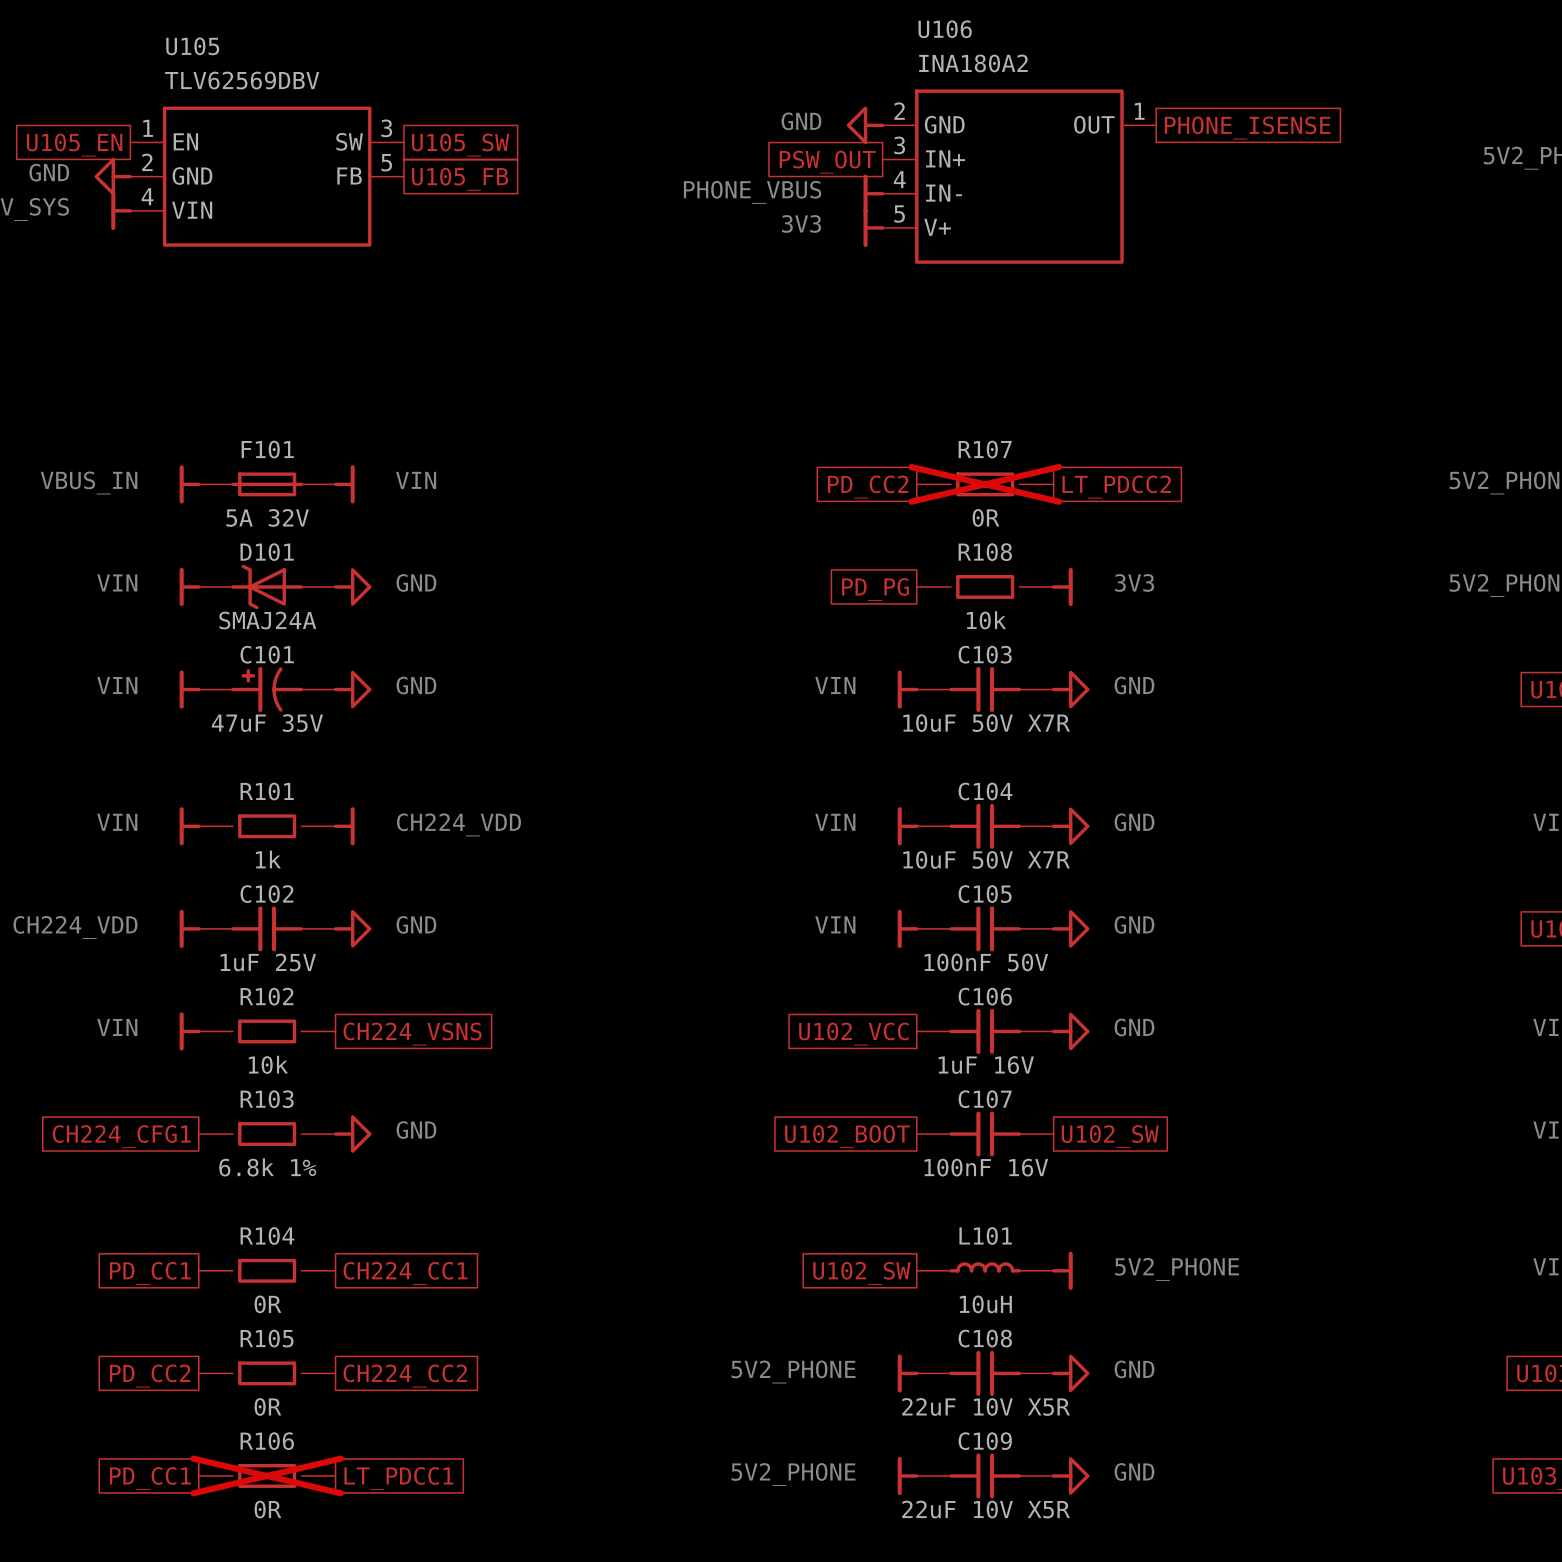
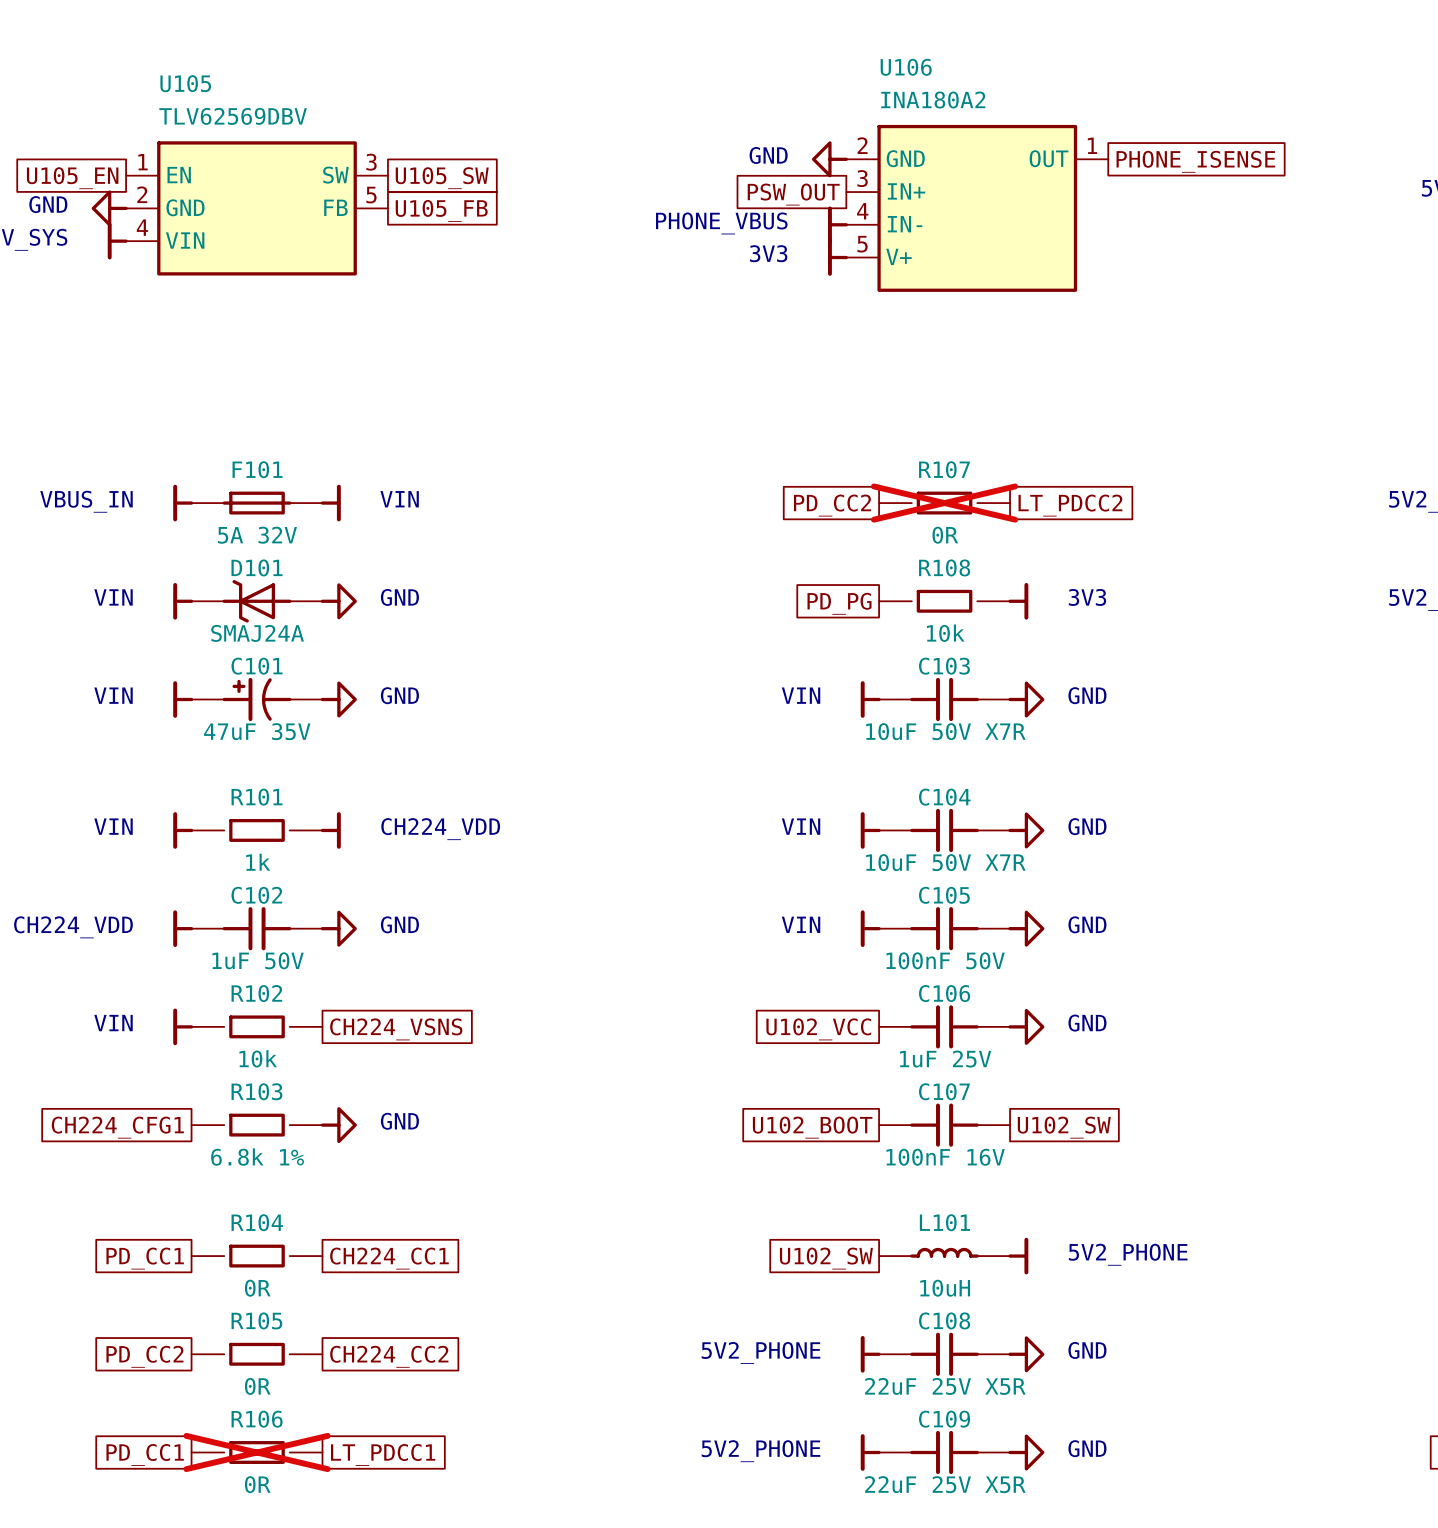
C102 value: 1uF 25V (268, 962) -> 1uF 50V (258, 960)
C106 value: 1uF 16V (986, 1065) -> 1uF 25V (945, 1059)
C108 value: 22uF 10V X5R (986, 1406) -> 22uF 25V X5R (945, 1386)
C109 value: 22uF 10V X5R (986, 1509) -> 22uF 25V X5R (945, 1484)

